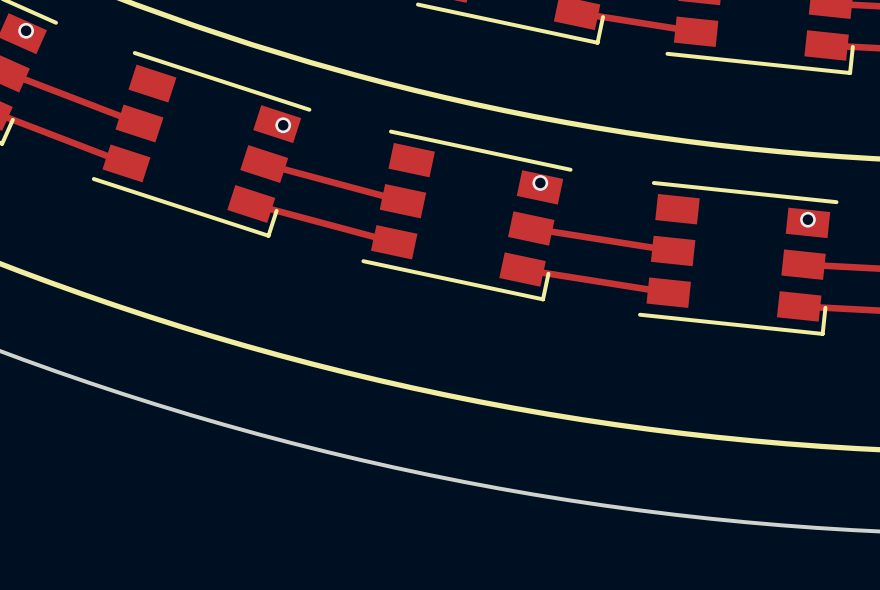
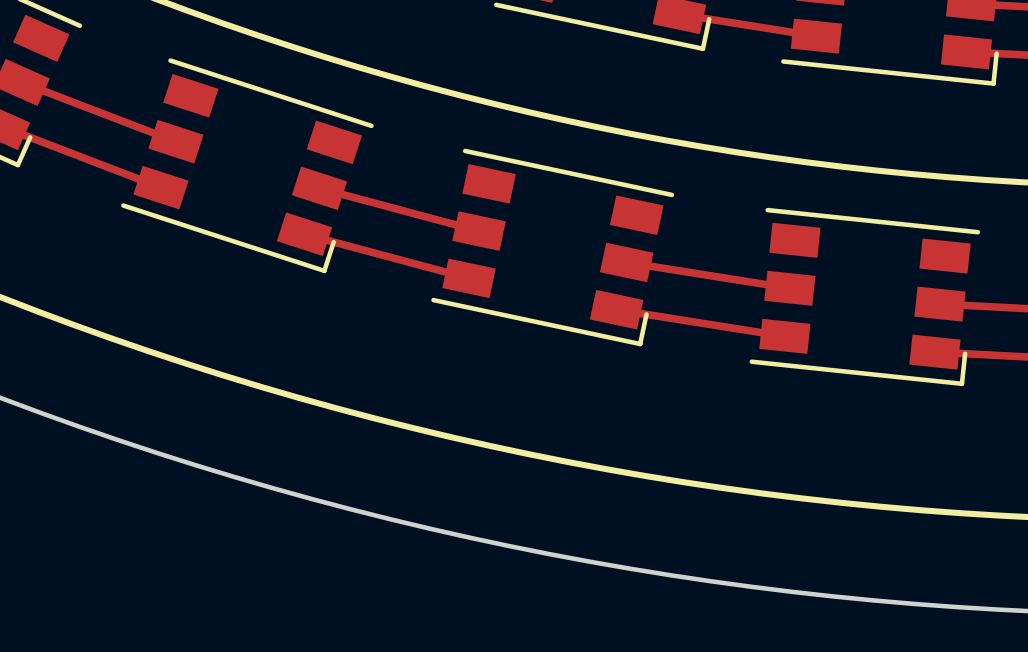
via: (26, 30) -> none
via: (283, 125) -> none
via: (540, 182) -> none
via: (807, 219) -> none

